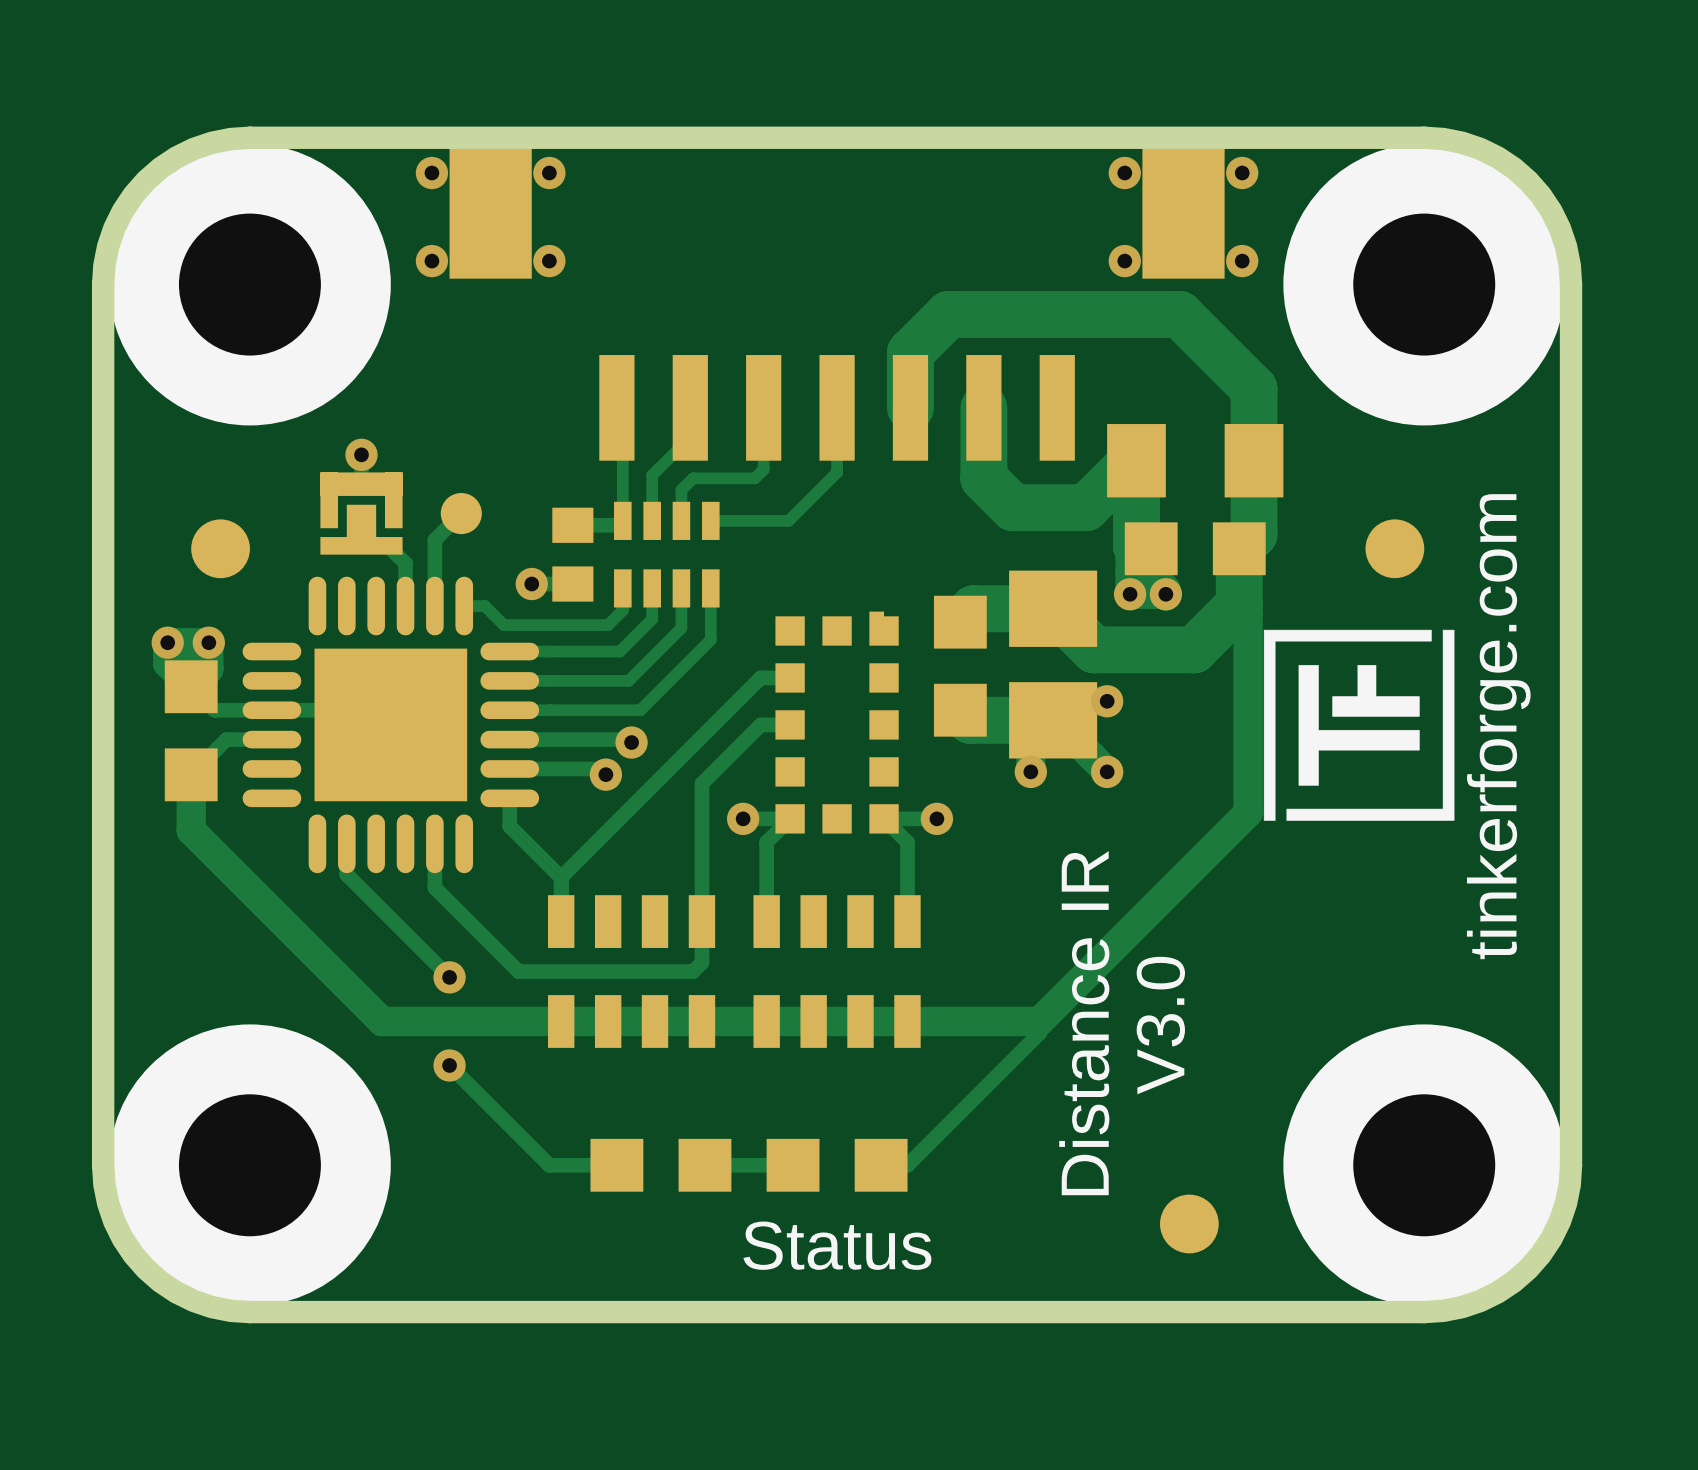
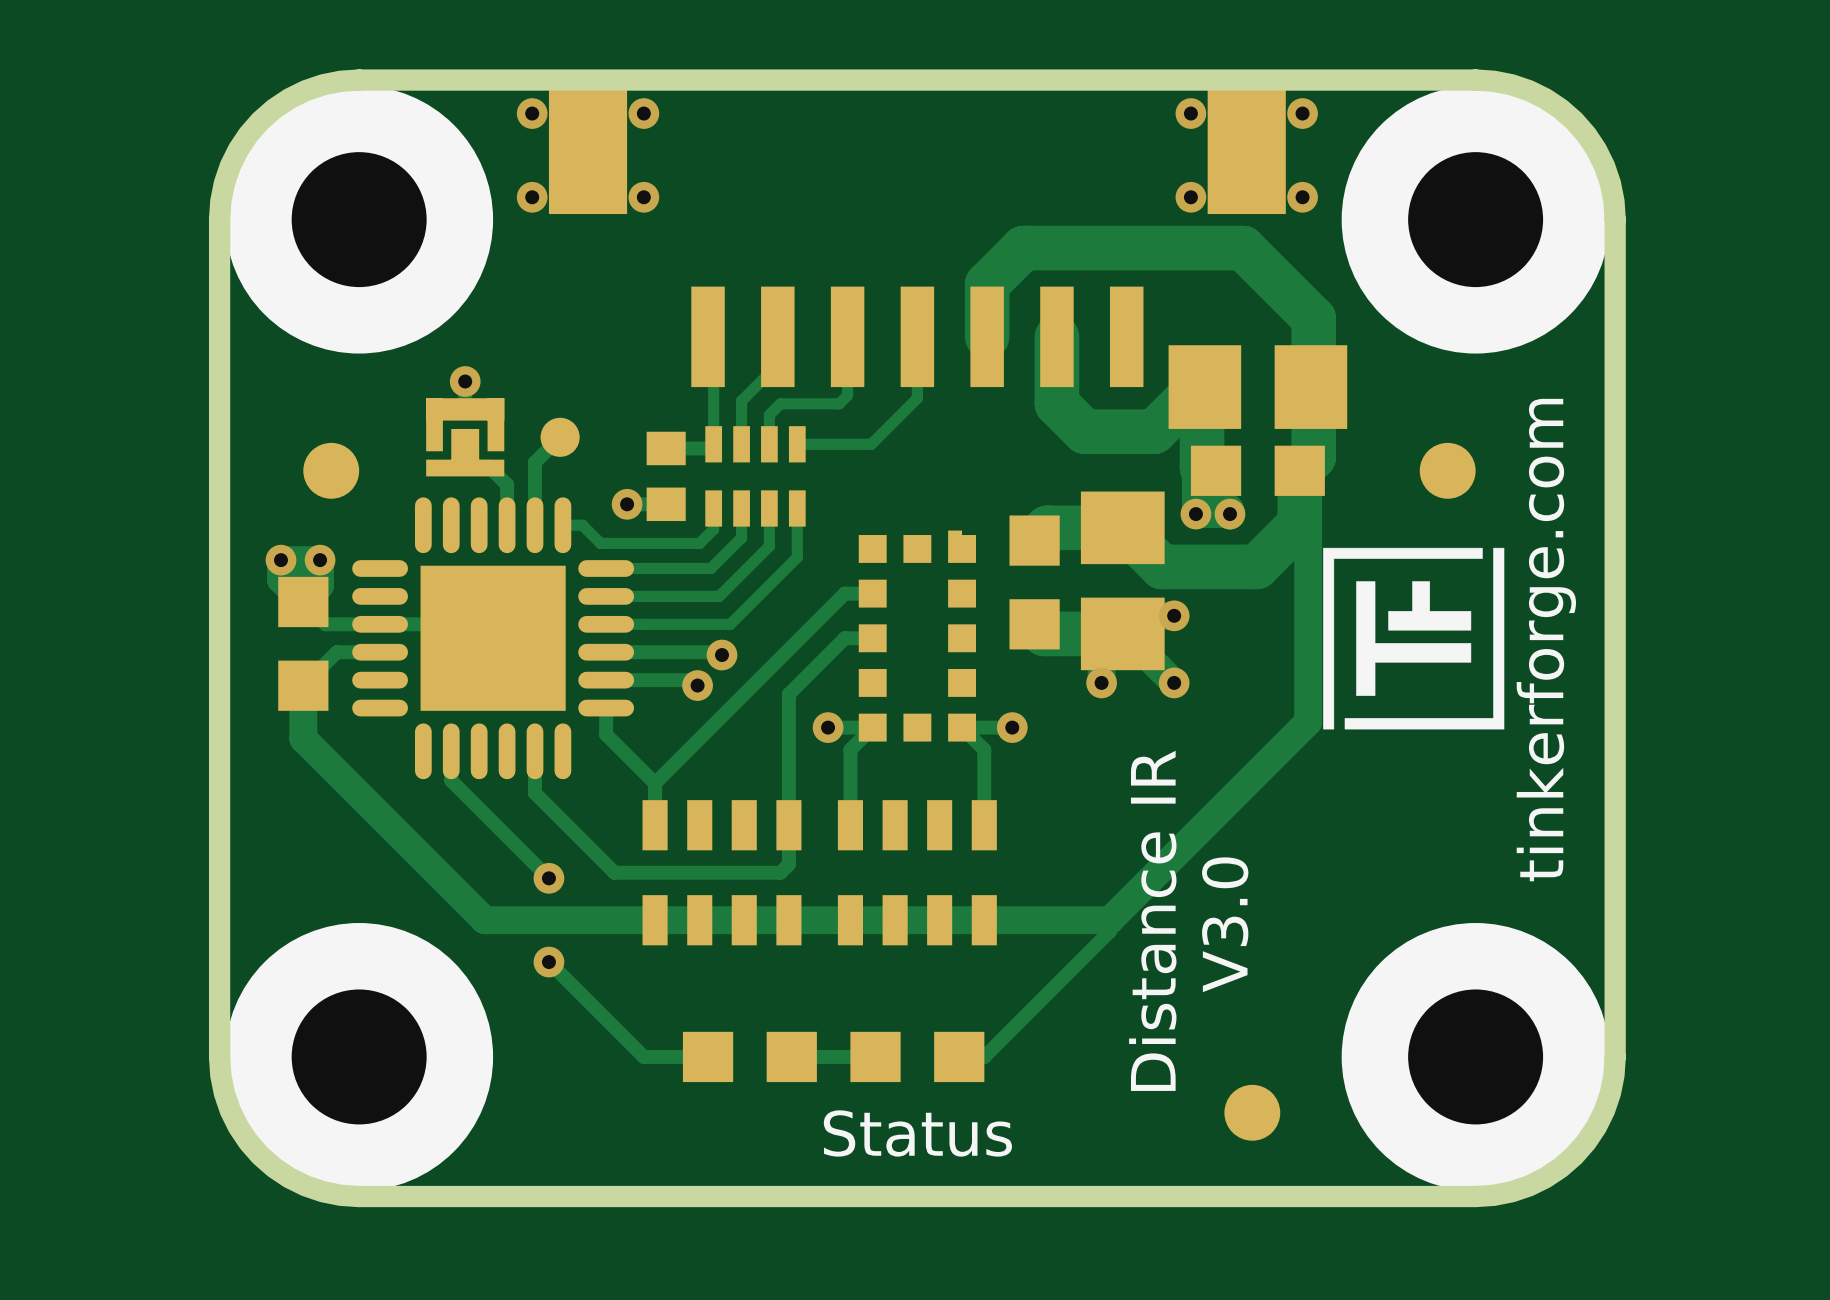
part footprint: [1107, 424, 1284, 498] -> [1168, 345, 1348, 429]

